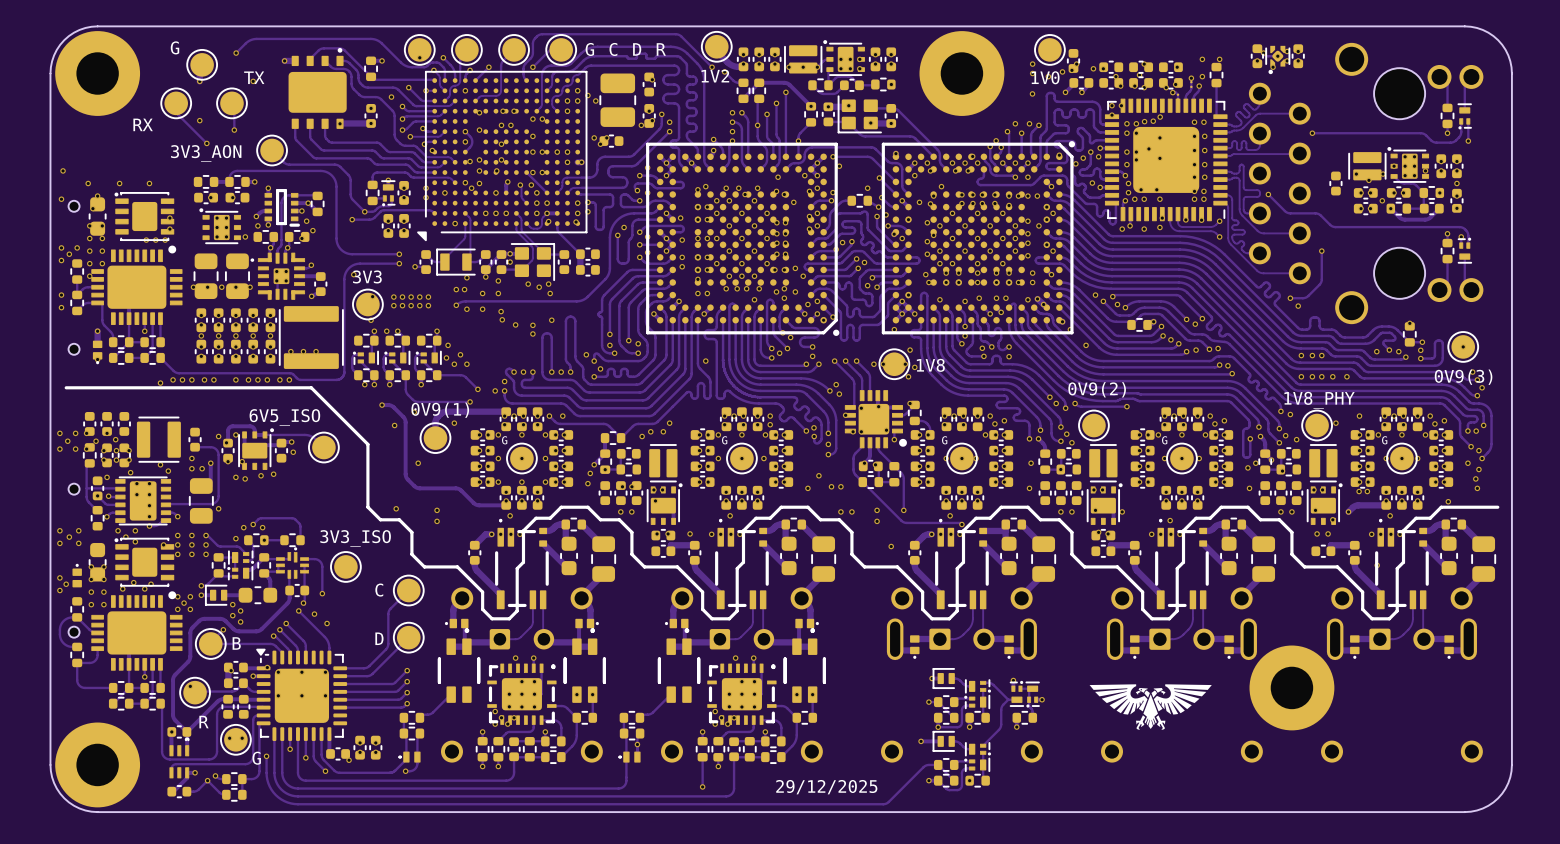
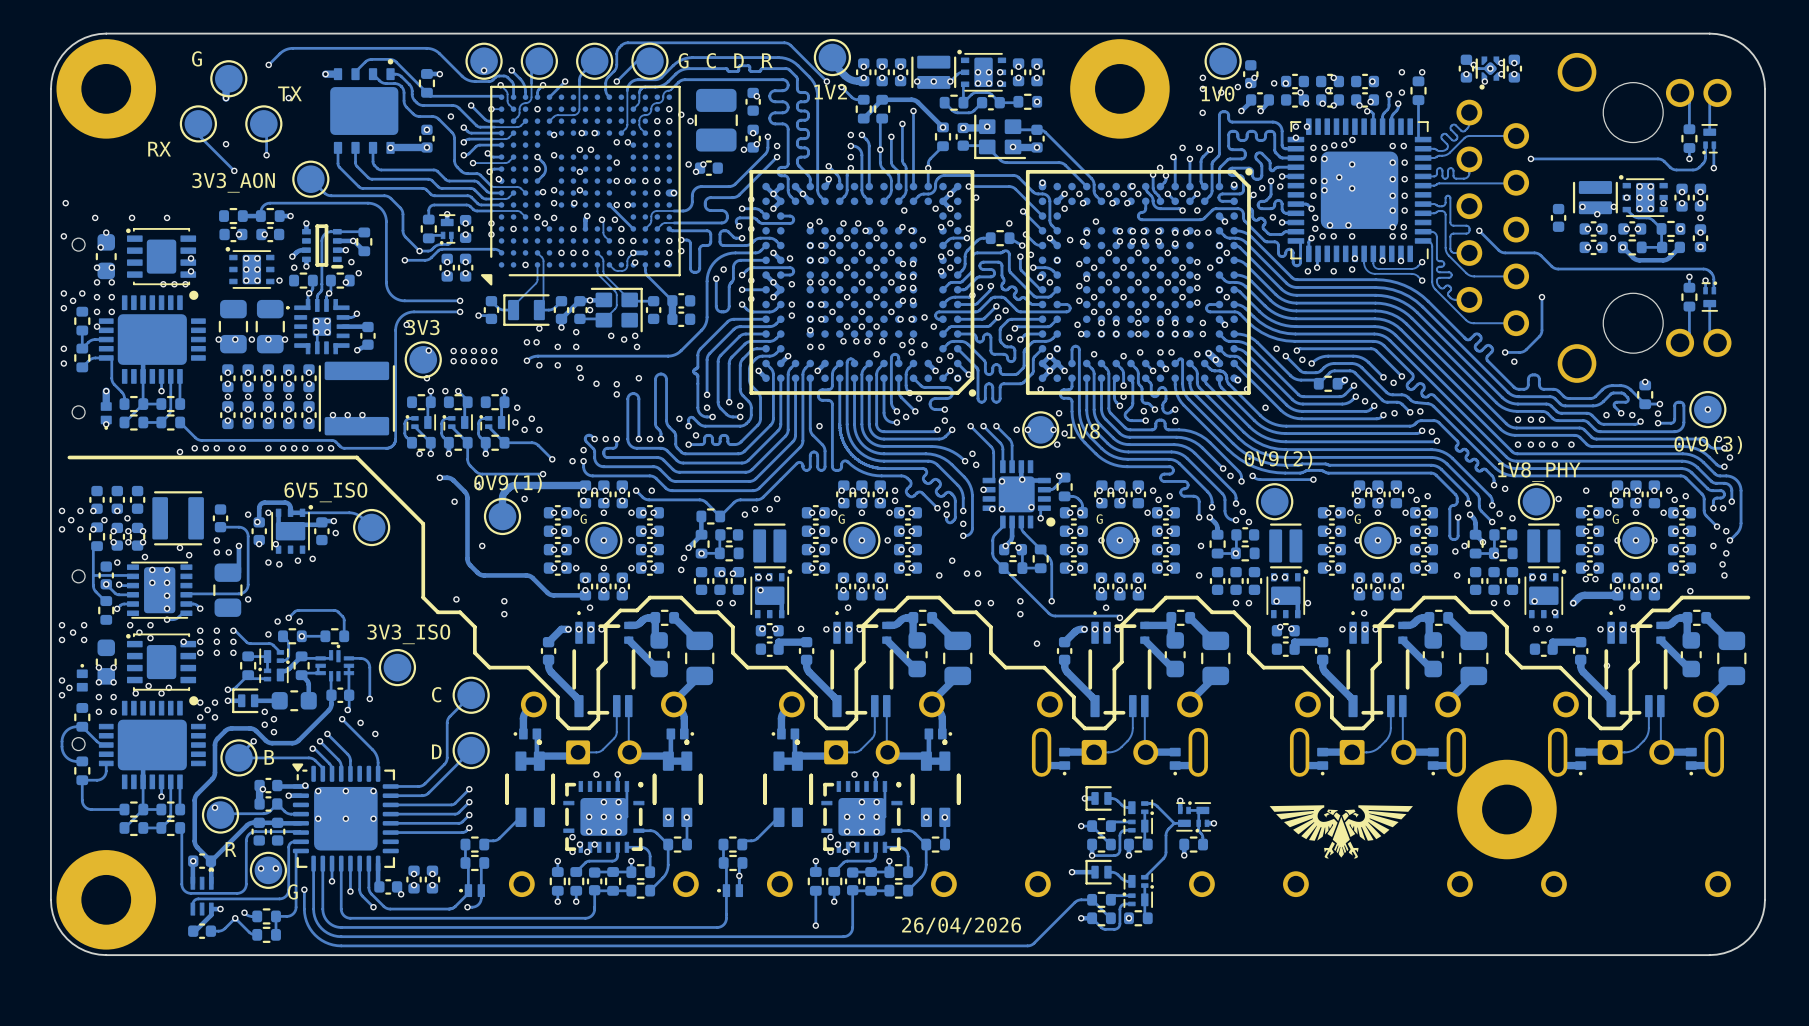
text: 29/12/2025 (826, 787) -> 26/04/2026 (961, 925)

